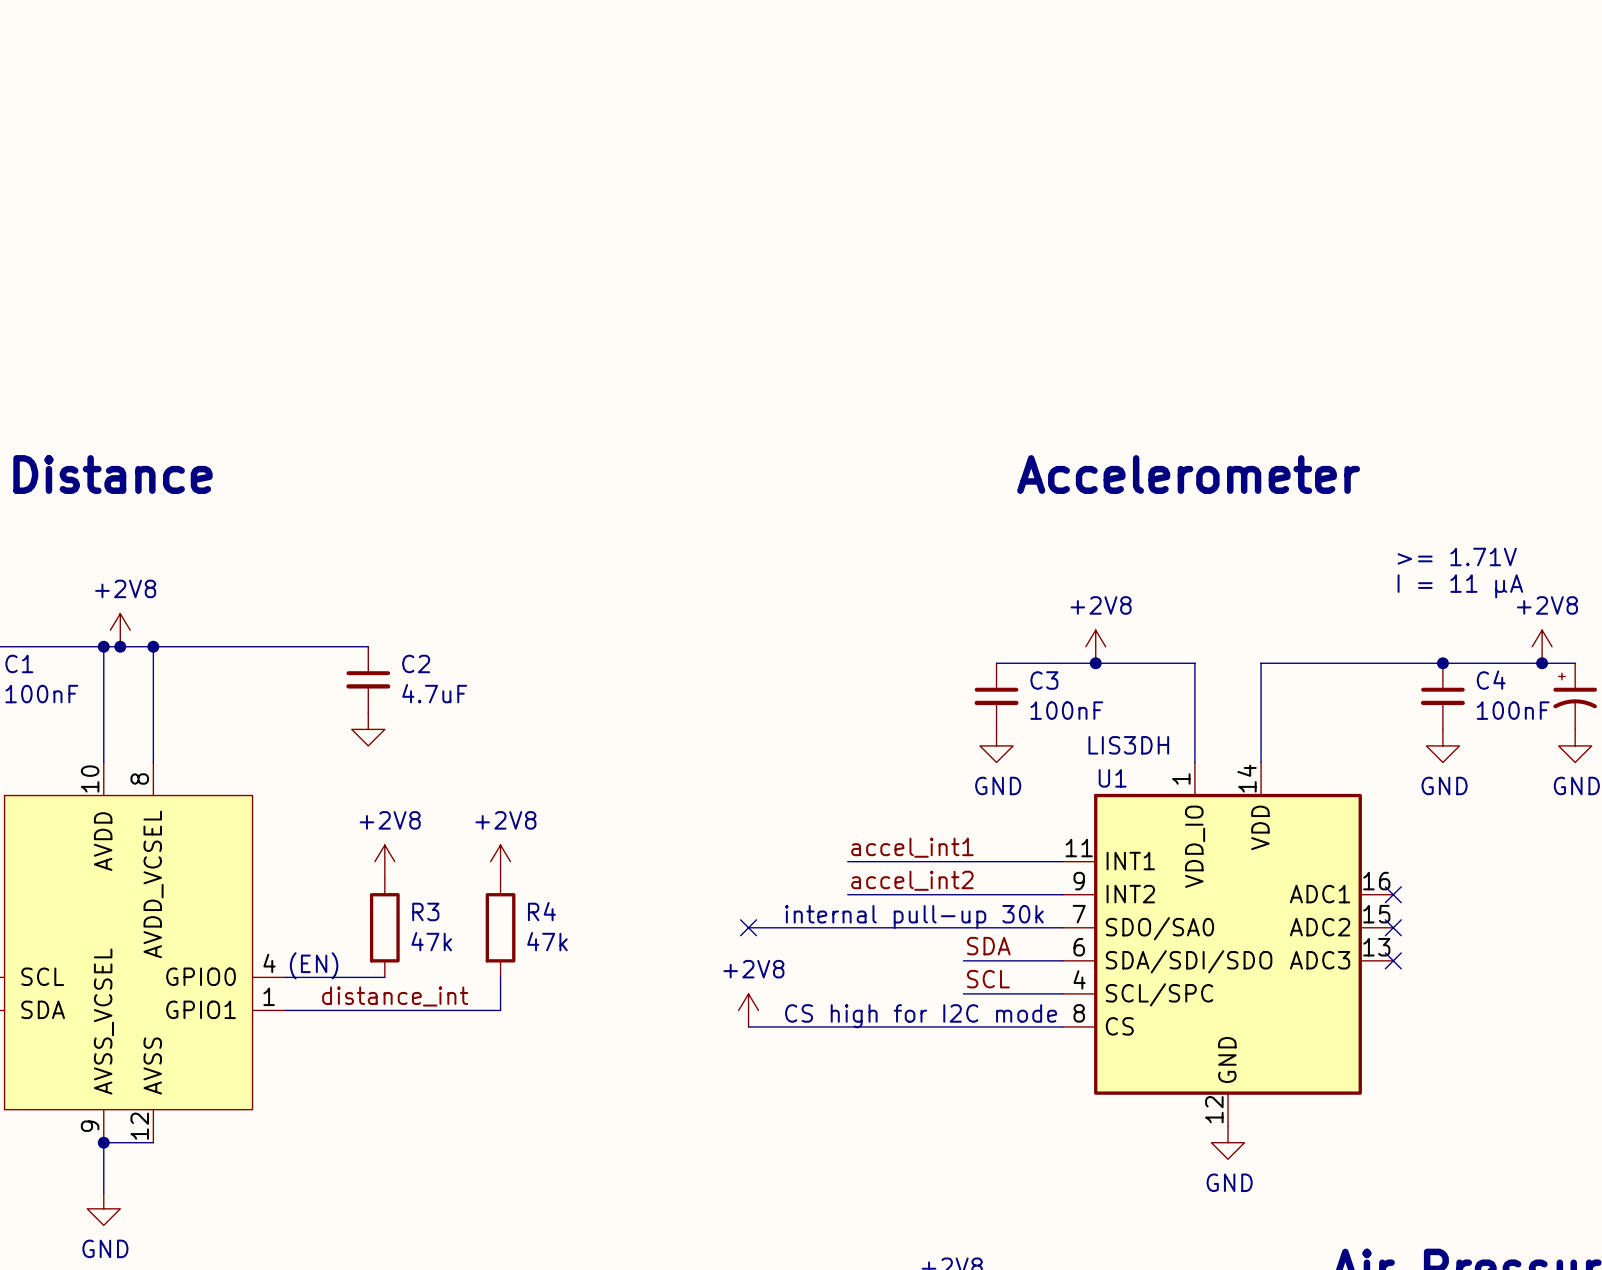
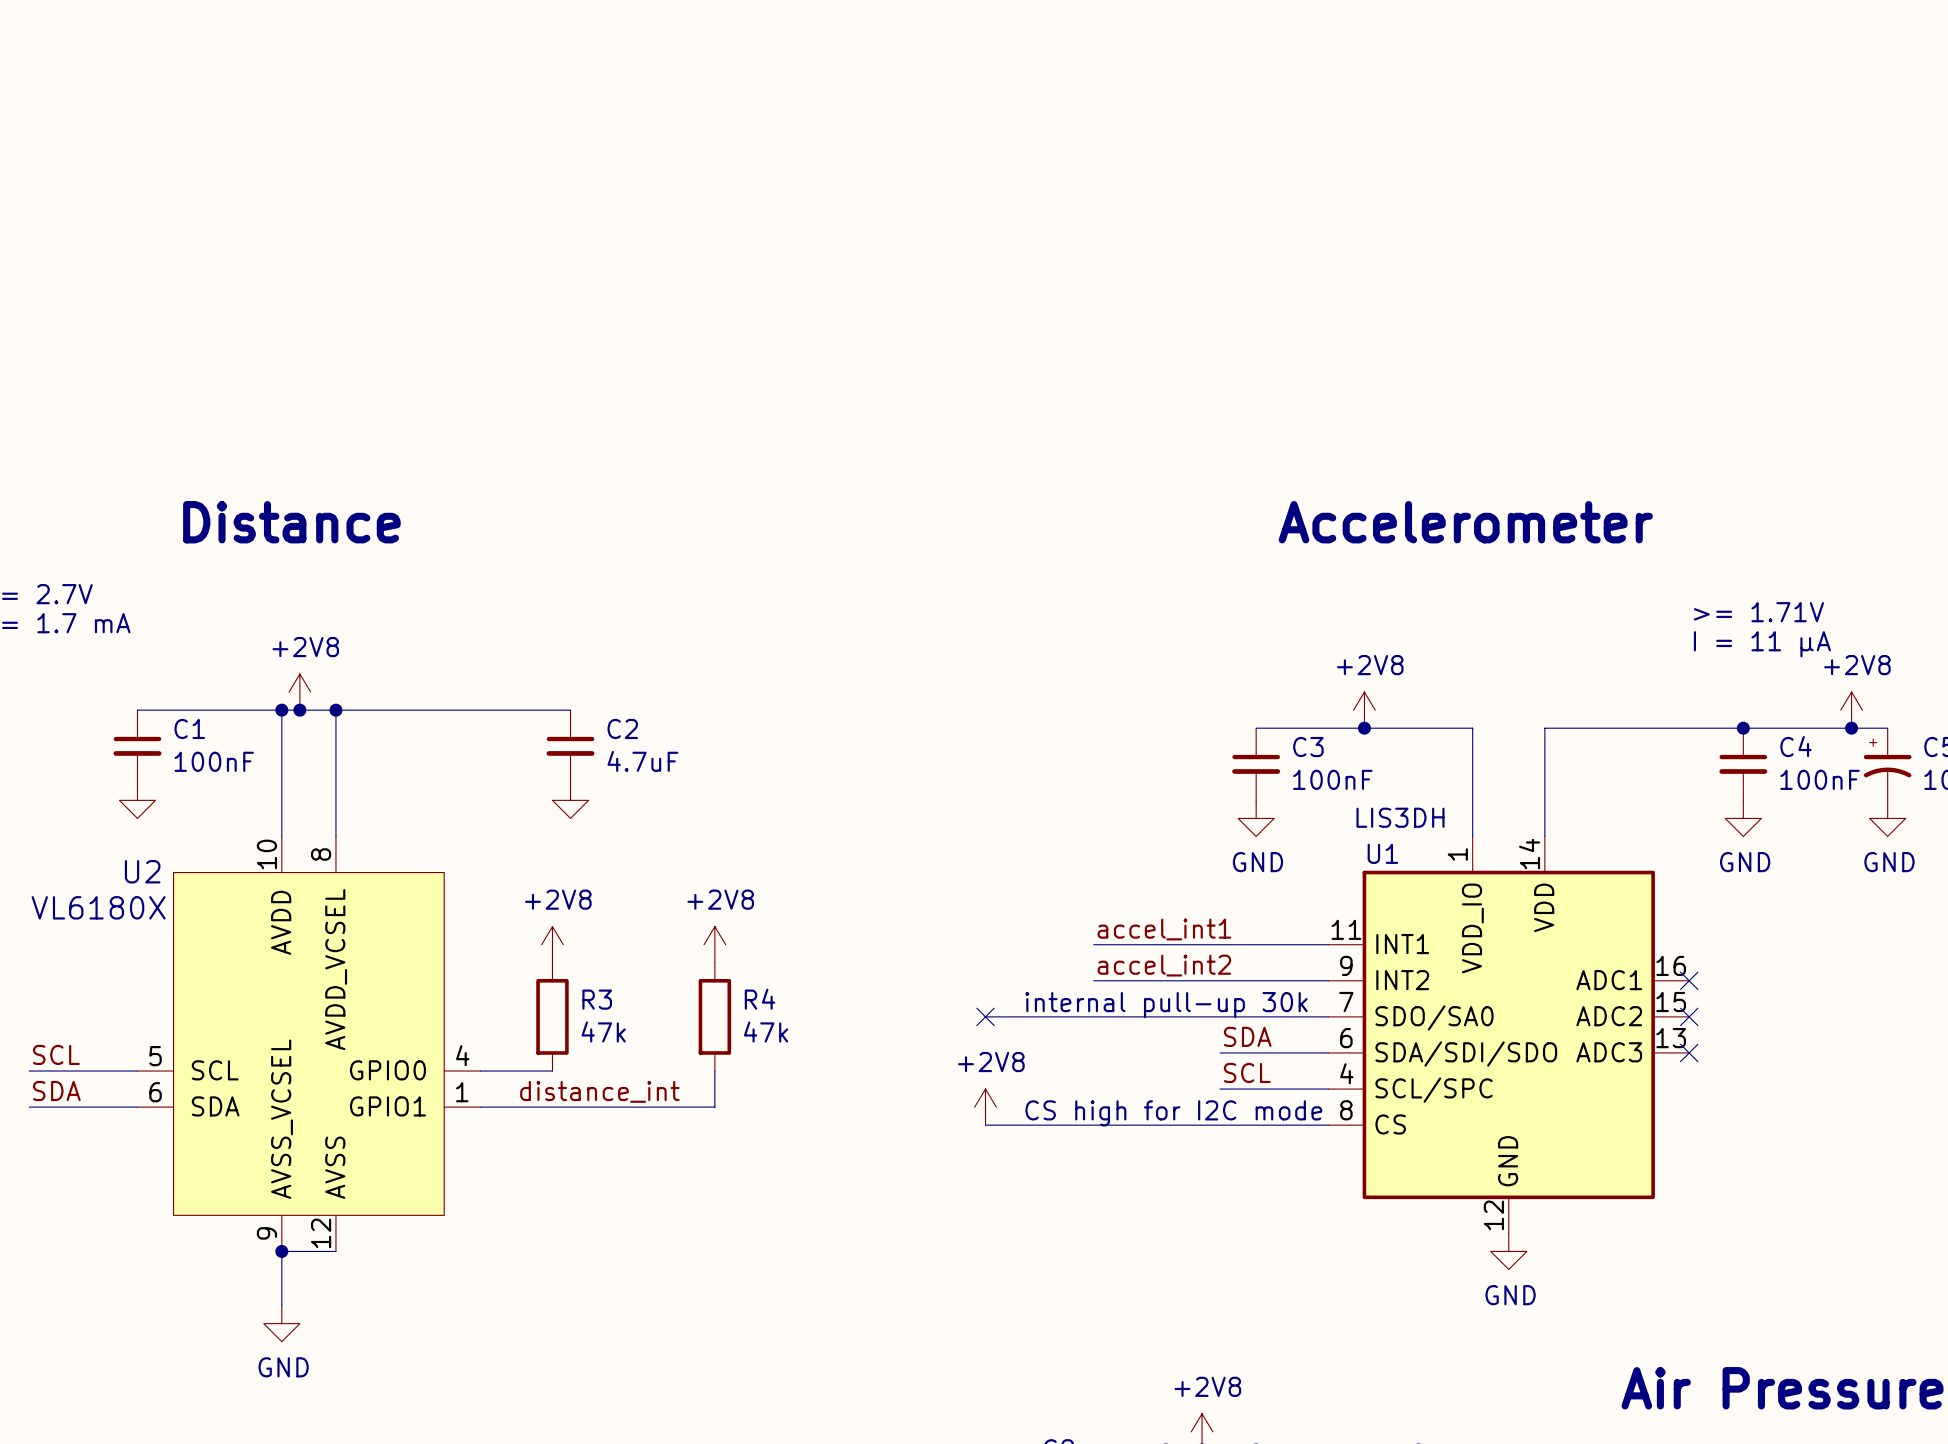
power symbol position: +2V8 (384, 861) -> +2V8 (552, 944)
R3 position: (384, 927) -> (552, 1016)
text: (EN) (314, 965) -> none
wire: (351, 977) (384, 977) -> none

